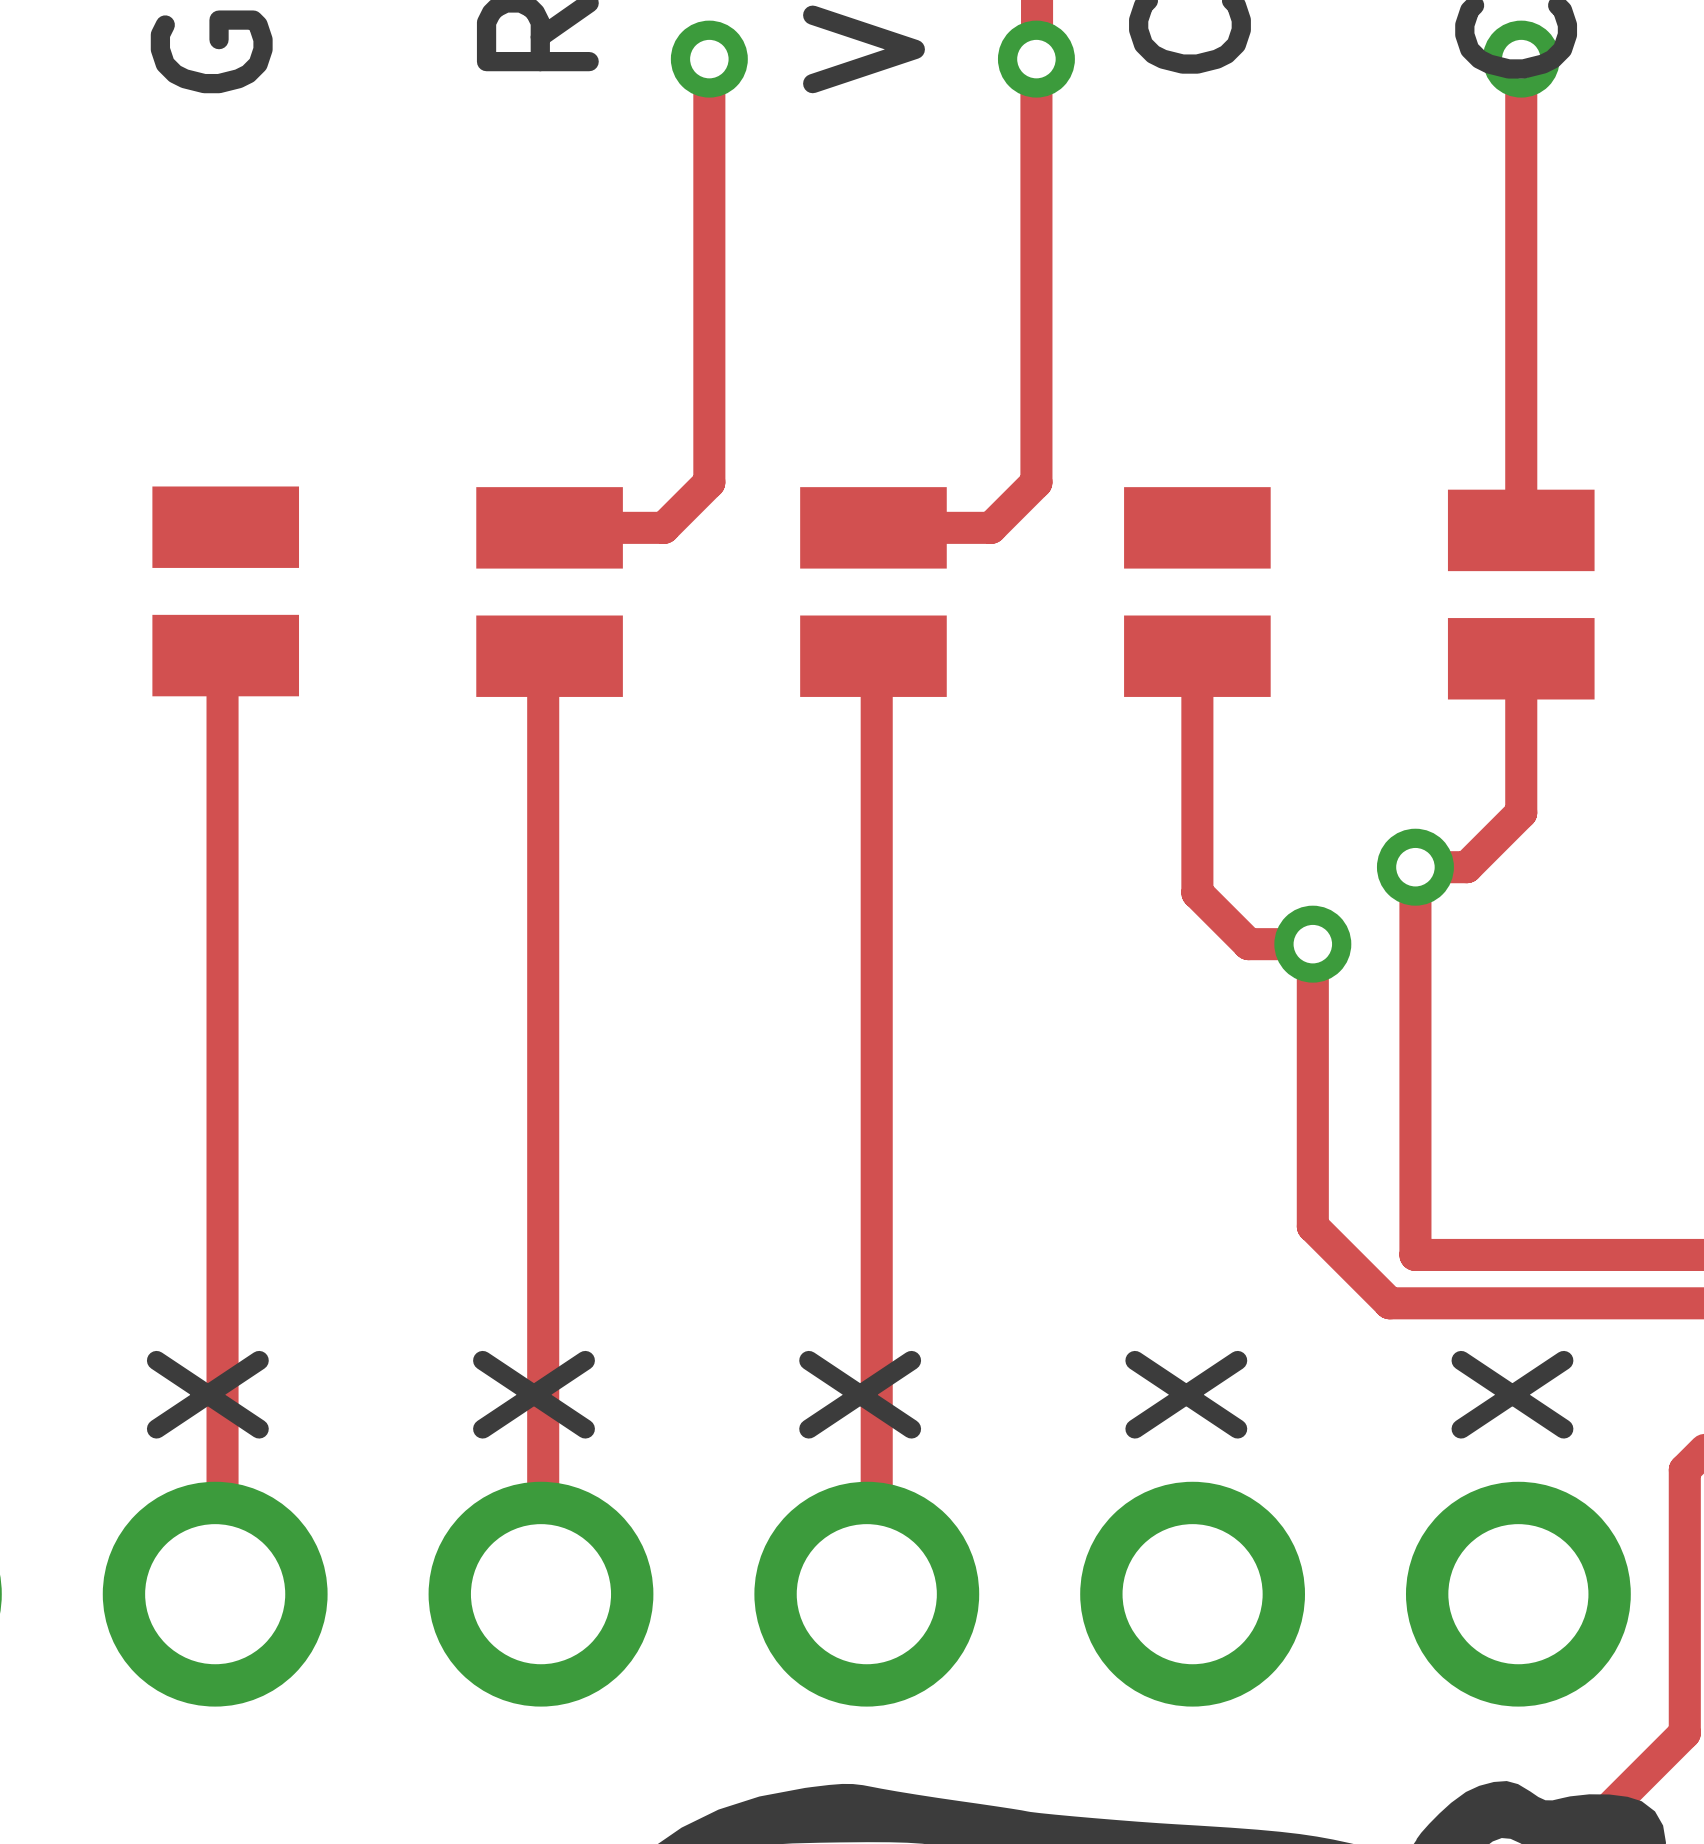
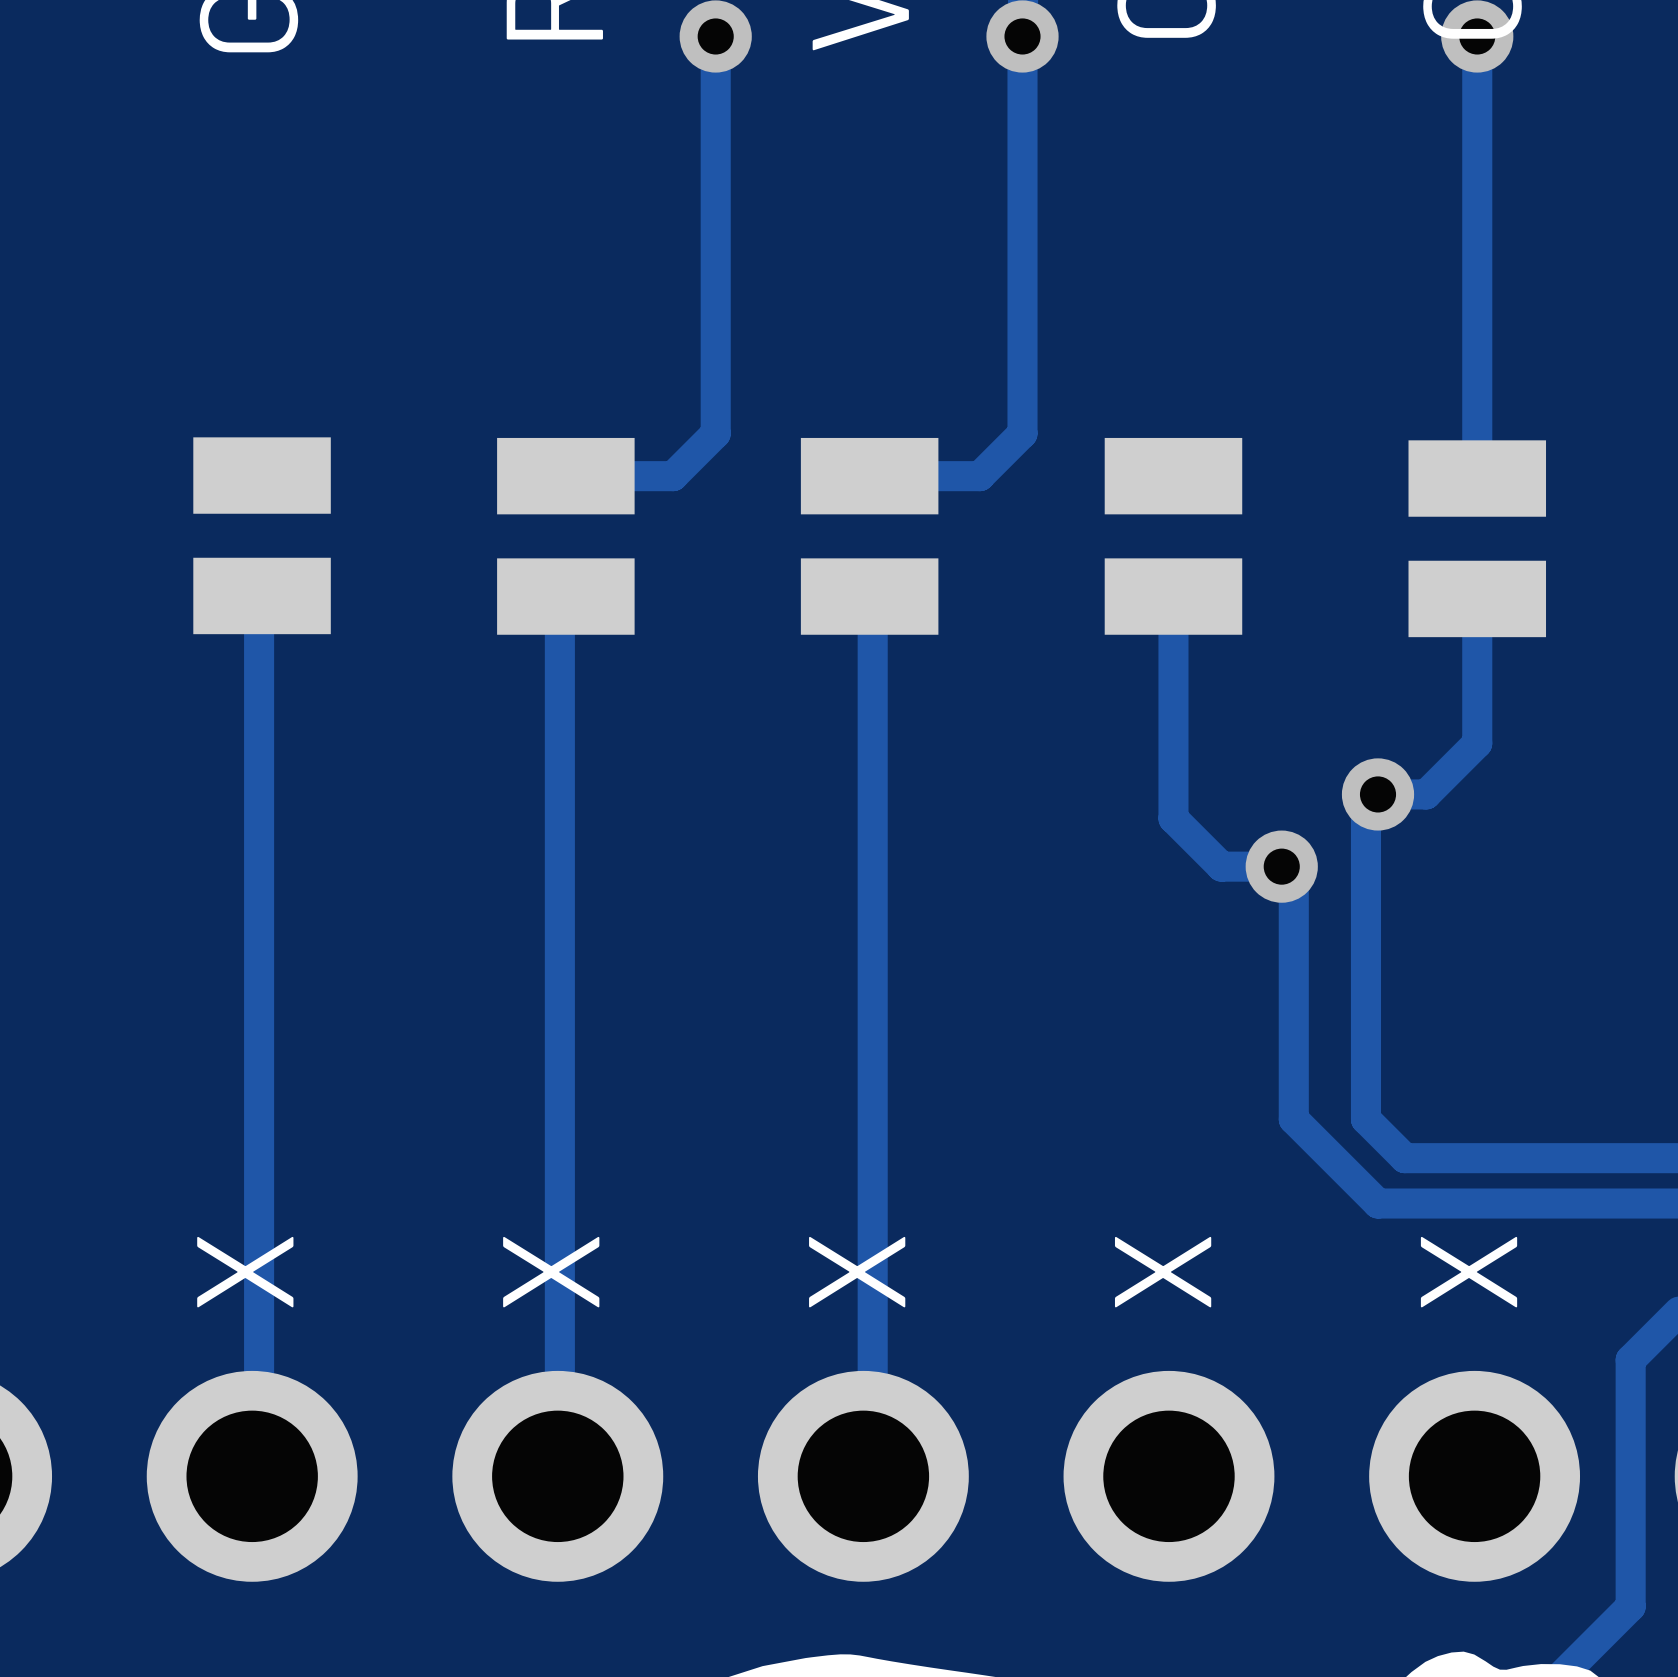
track: (1415, 867) (1415, 1254) (1444, 1254) -> (1378, 794) (1365, 794) (1365, 1119) (1404, 1158)
track: (1312, 944) (1312, 1226) (1389, 1303) (1415, 1303) -> (1281, 866) (1293, 866) (1293, 1119) (1378, 1203)

